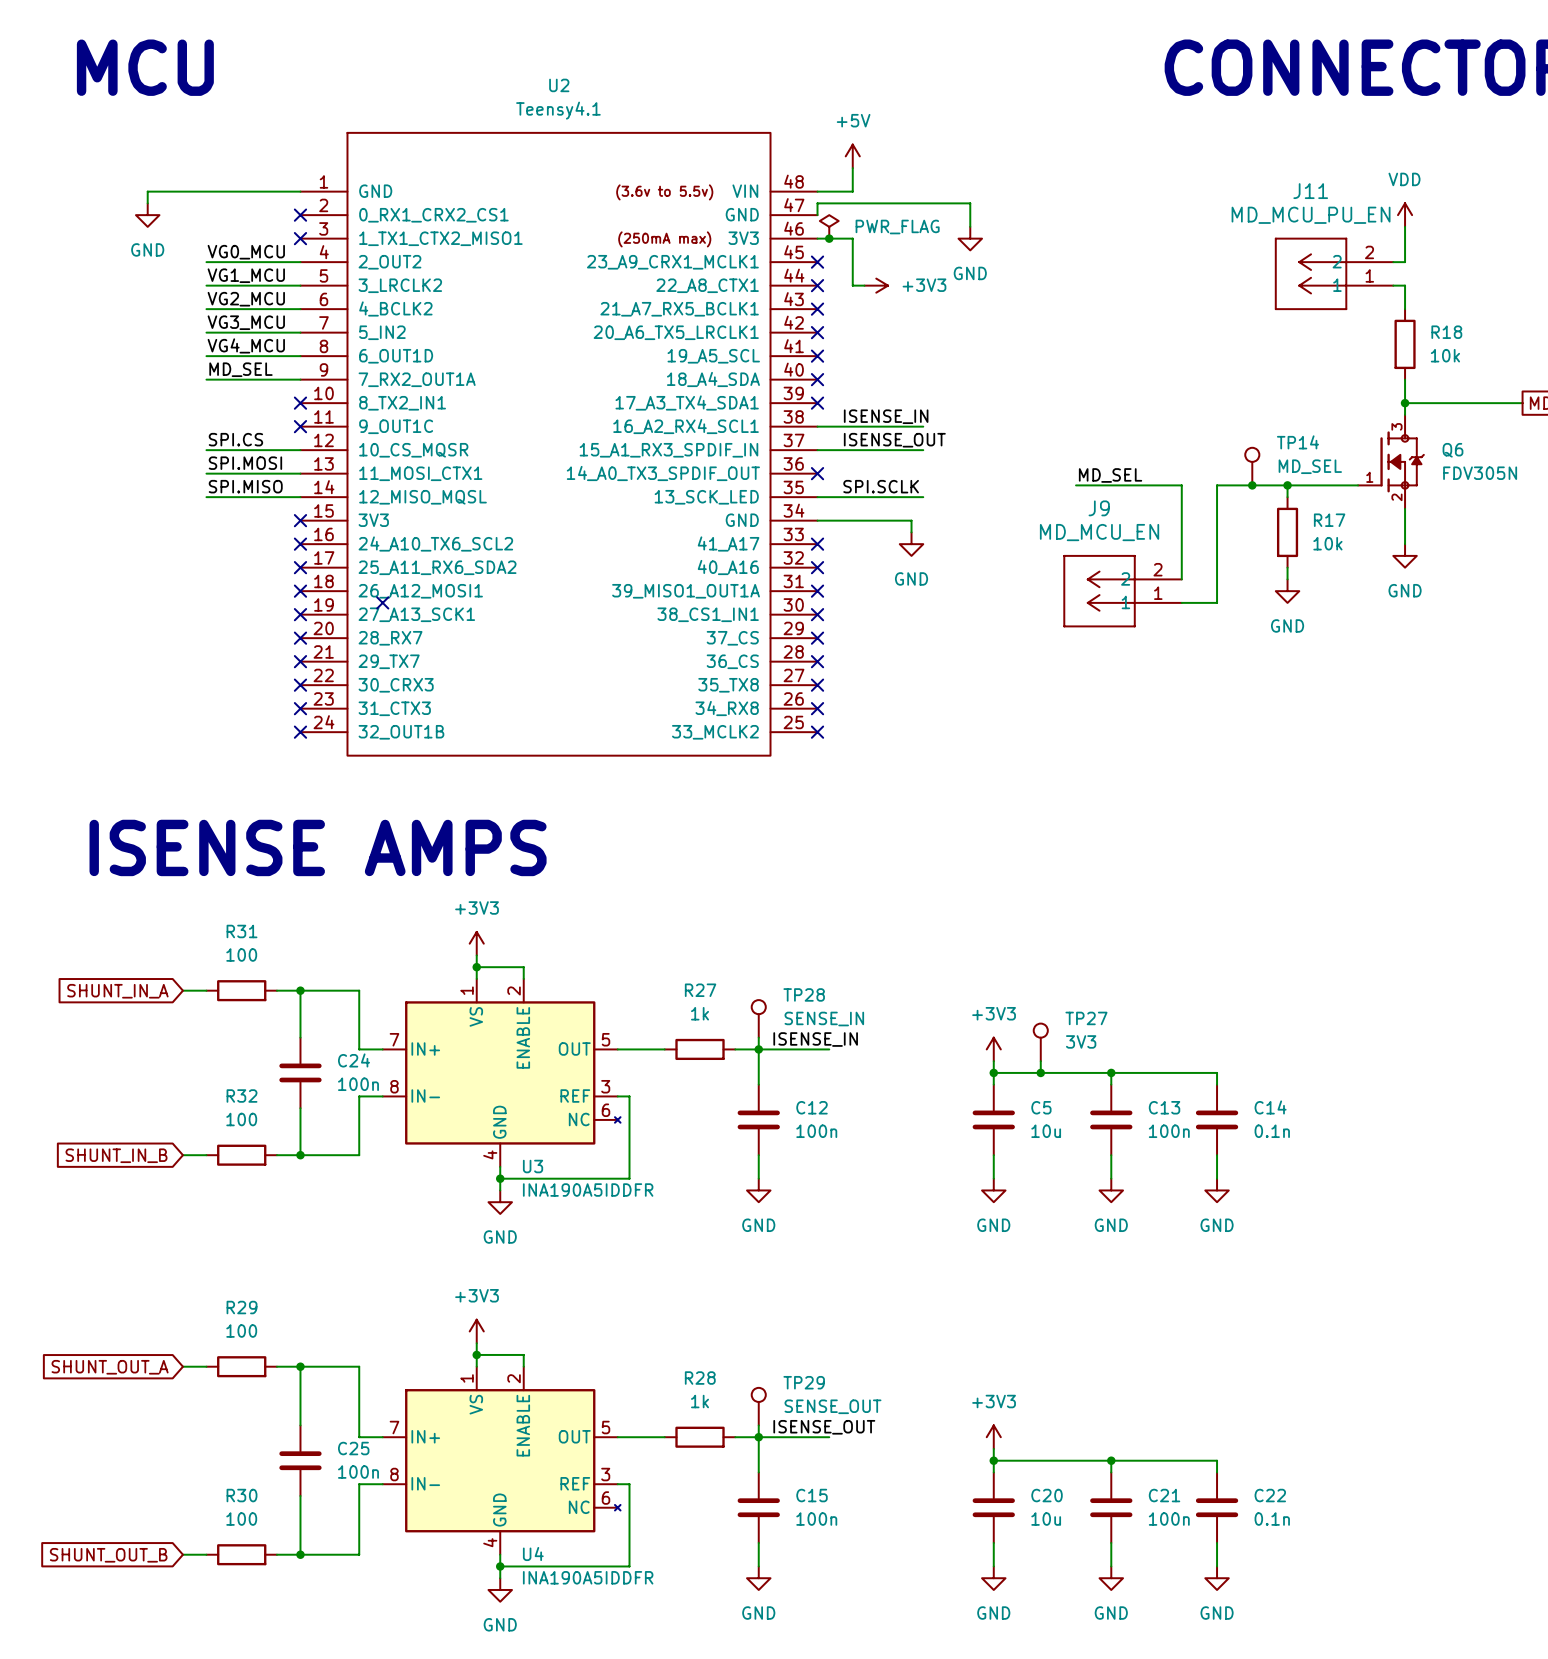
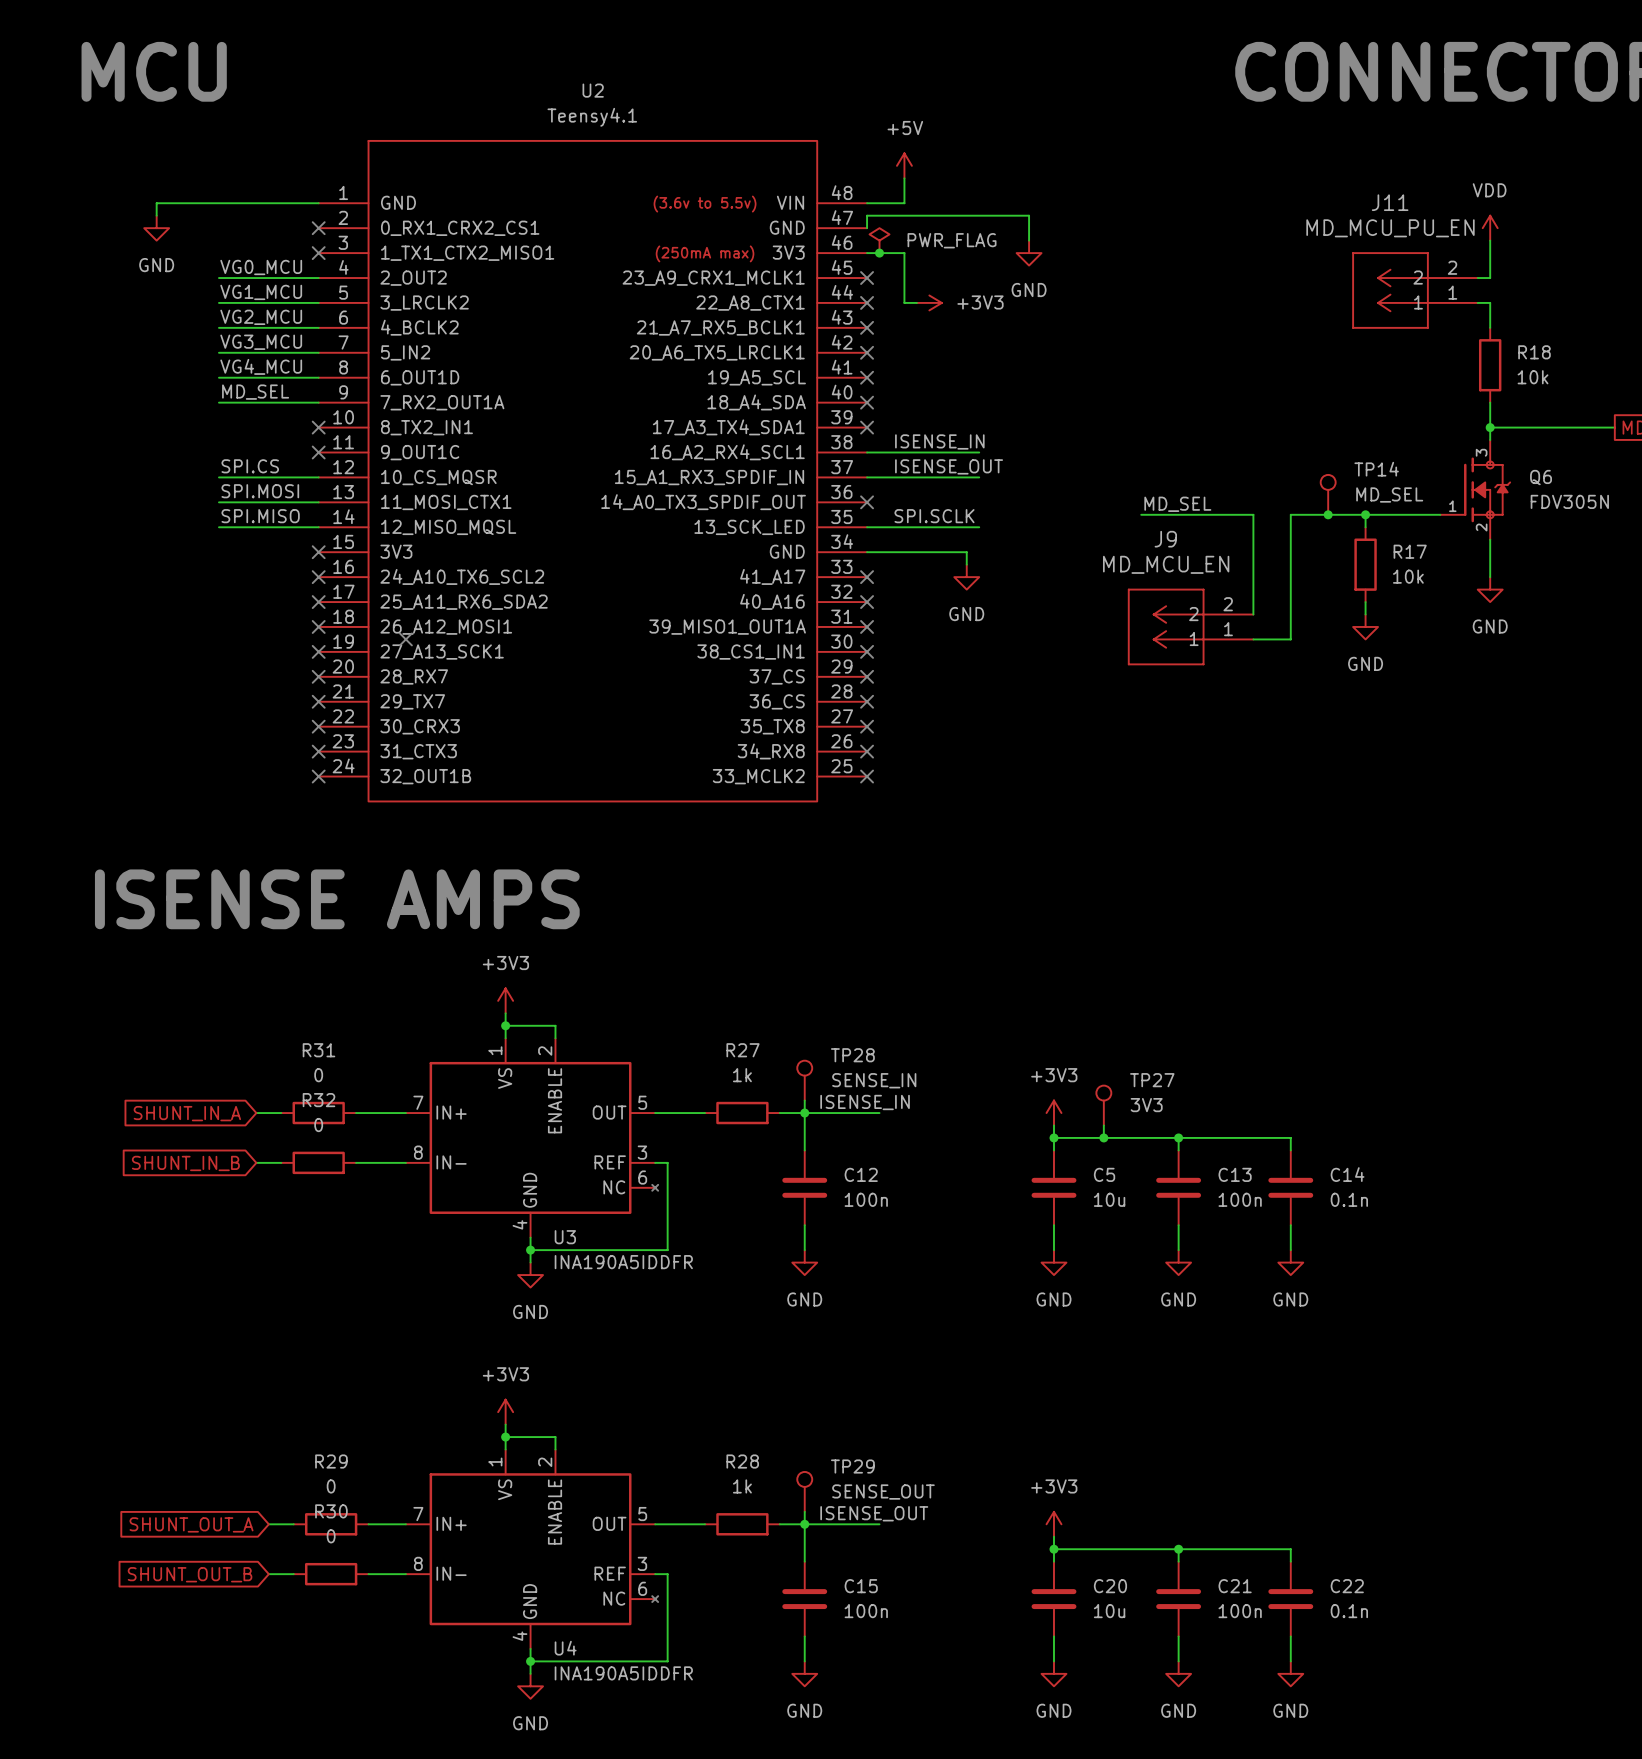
R31 value: 100 (241, 954) -> 0 (318, 1075)
wire: (182, 990) (206, 990) -> (256, 1113) (281, 1113)
R31 position: (241, 990) -> (318, 1113)
wire: (276, 990) (359, 990) (359, 1049) -> (356, 1113) (381, 1113)
wire: (300, 990) (300, 1037) -> none
junction: (300, 990) -> none
global label position: SHUNT_IN_A (117, 991) -> SHUNT_IN_A (187, 1113)
C24: 100n (300, 1072) -> none
wire: (359, 1096) (359, 1155) (276, 1155) -> (381, 1162) (356, 1162)
wire: (300, 1108) (300, 1155) -> none
R32 value: 100 (241, 1119) -> 0 (318, 1125)
global label position: SHUNT_IN_B (116, 1155) -> SHUNT_IN_B (185, 1163)
wire: (182, 1155) (206, 1155) -> (256, 1162) (281, 1162)
R32 position: (241, 1155) -> (318, 1162)
junction: (300, 1155) -> none
R29 value: 100 (241, 1331) -> 0 (331, 1486)
wire: (182, 1366) (206, 1366) -> (268, 1524) (293, 1524)
R29 position: (241, 1366) -> (331, 1524)
wire: (276, 1366) (359, 1366) (359, 1437) -> (368, 1524) (381, 1524)
wire: (300, 1366) (300, 1425) -> none
junction: (300, 1366) -> none
global label position: SHUNT_OUT_A (110, 1367) -> SHUNT_OUT_A (191, 1524)
C25: 100n (300, 1460) -> none
wire: (359, 1484) (359, 1554) (276, 1554) -> (381, 1574) (368, 1574)
wire: (300, 1495) (300, 1554) -> none
R30 value: 100 (241, 1519) -> 0 (331, 1536)
wire: (182, 1554) (206, 1554) -> (268, 1574) (293, 1574)
R30 position: (241, 1554) -> (331, 1574)
junction: (300, 1554) -> none
global label position: SHUNT_OUT_B (108, 1555) -> SHUNT_OUT_B (190, 1574)

